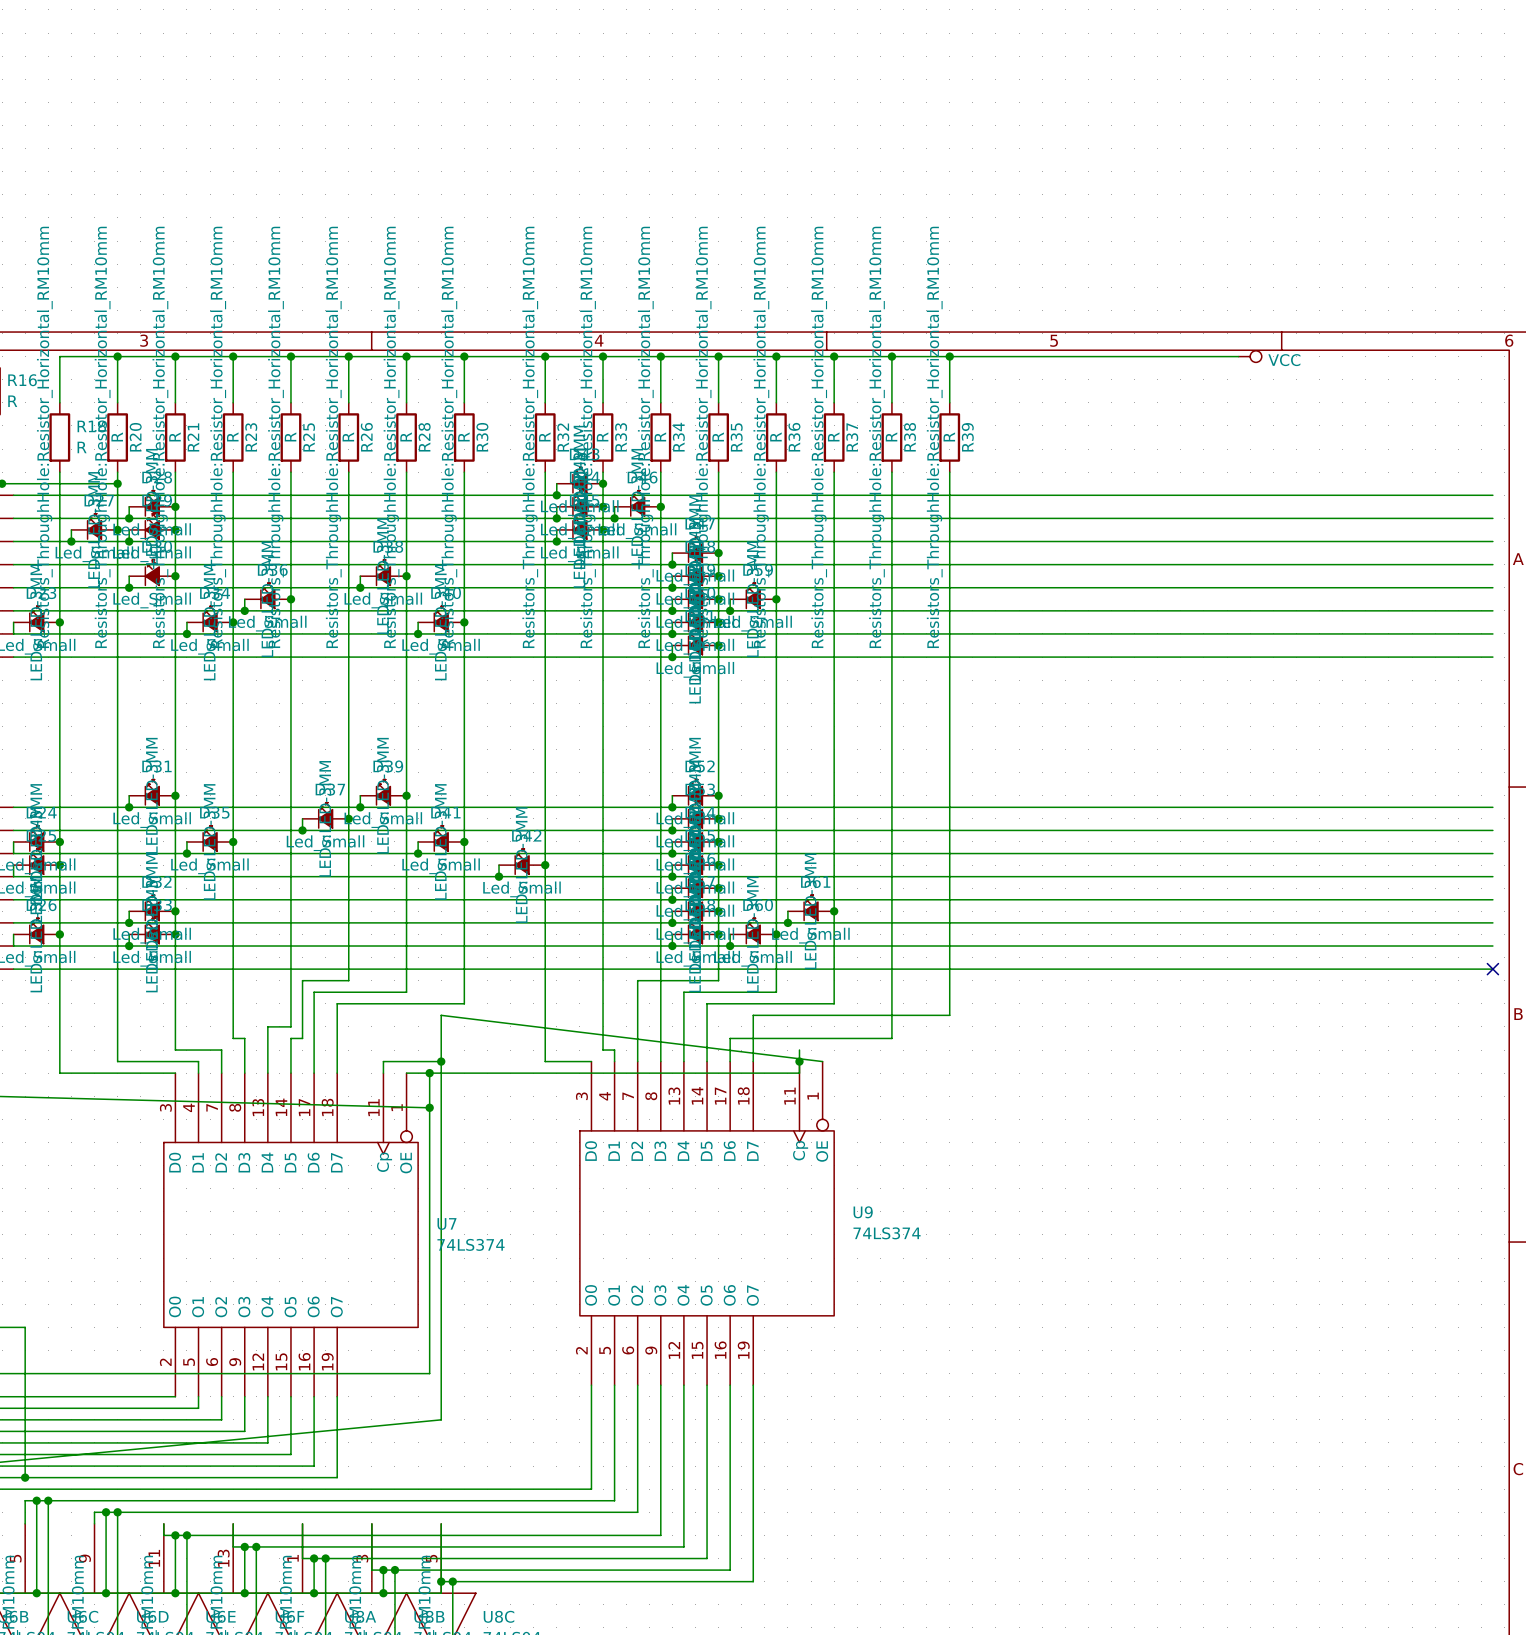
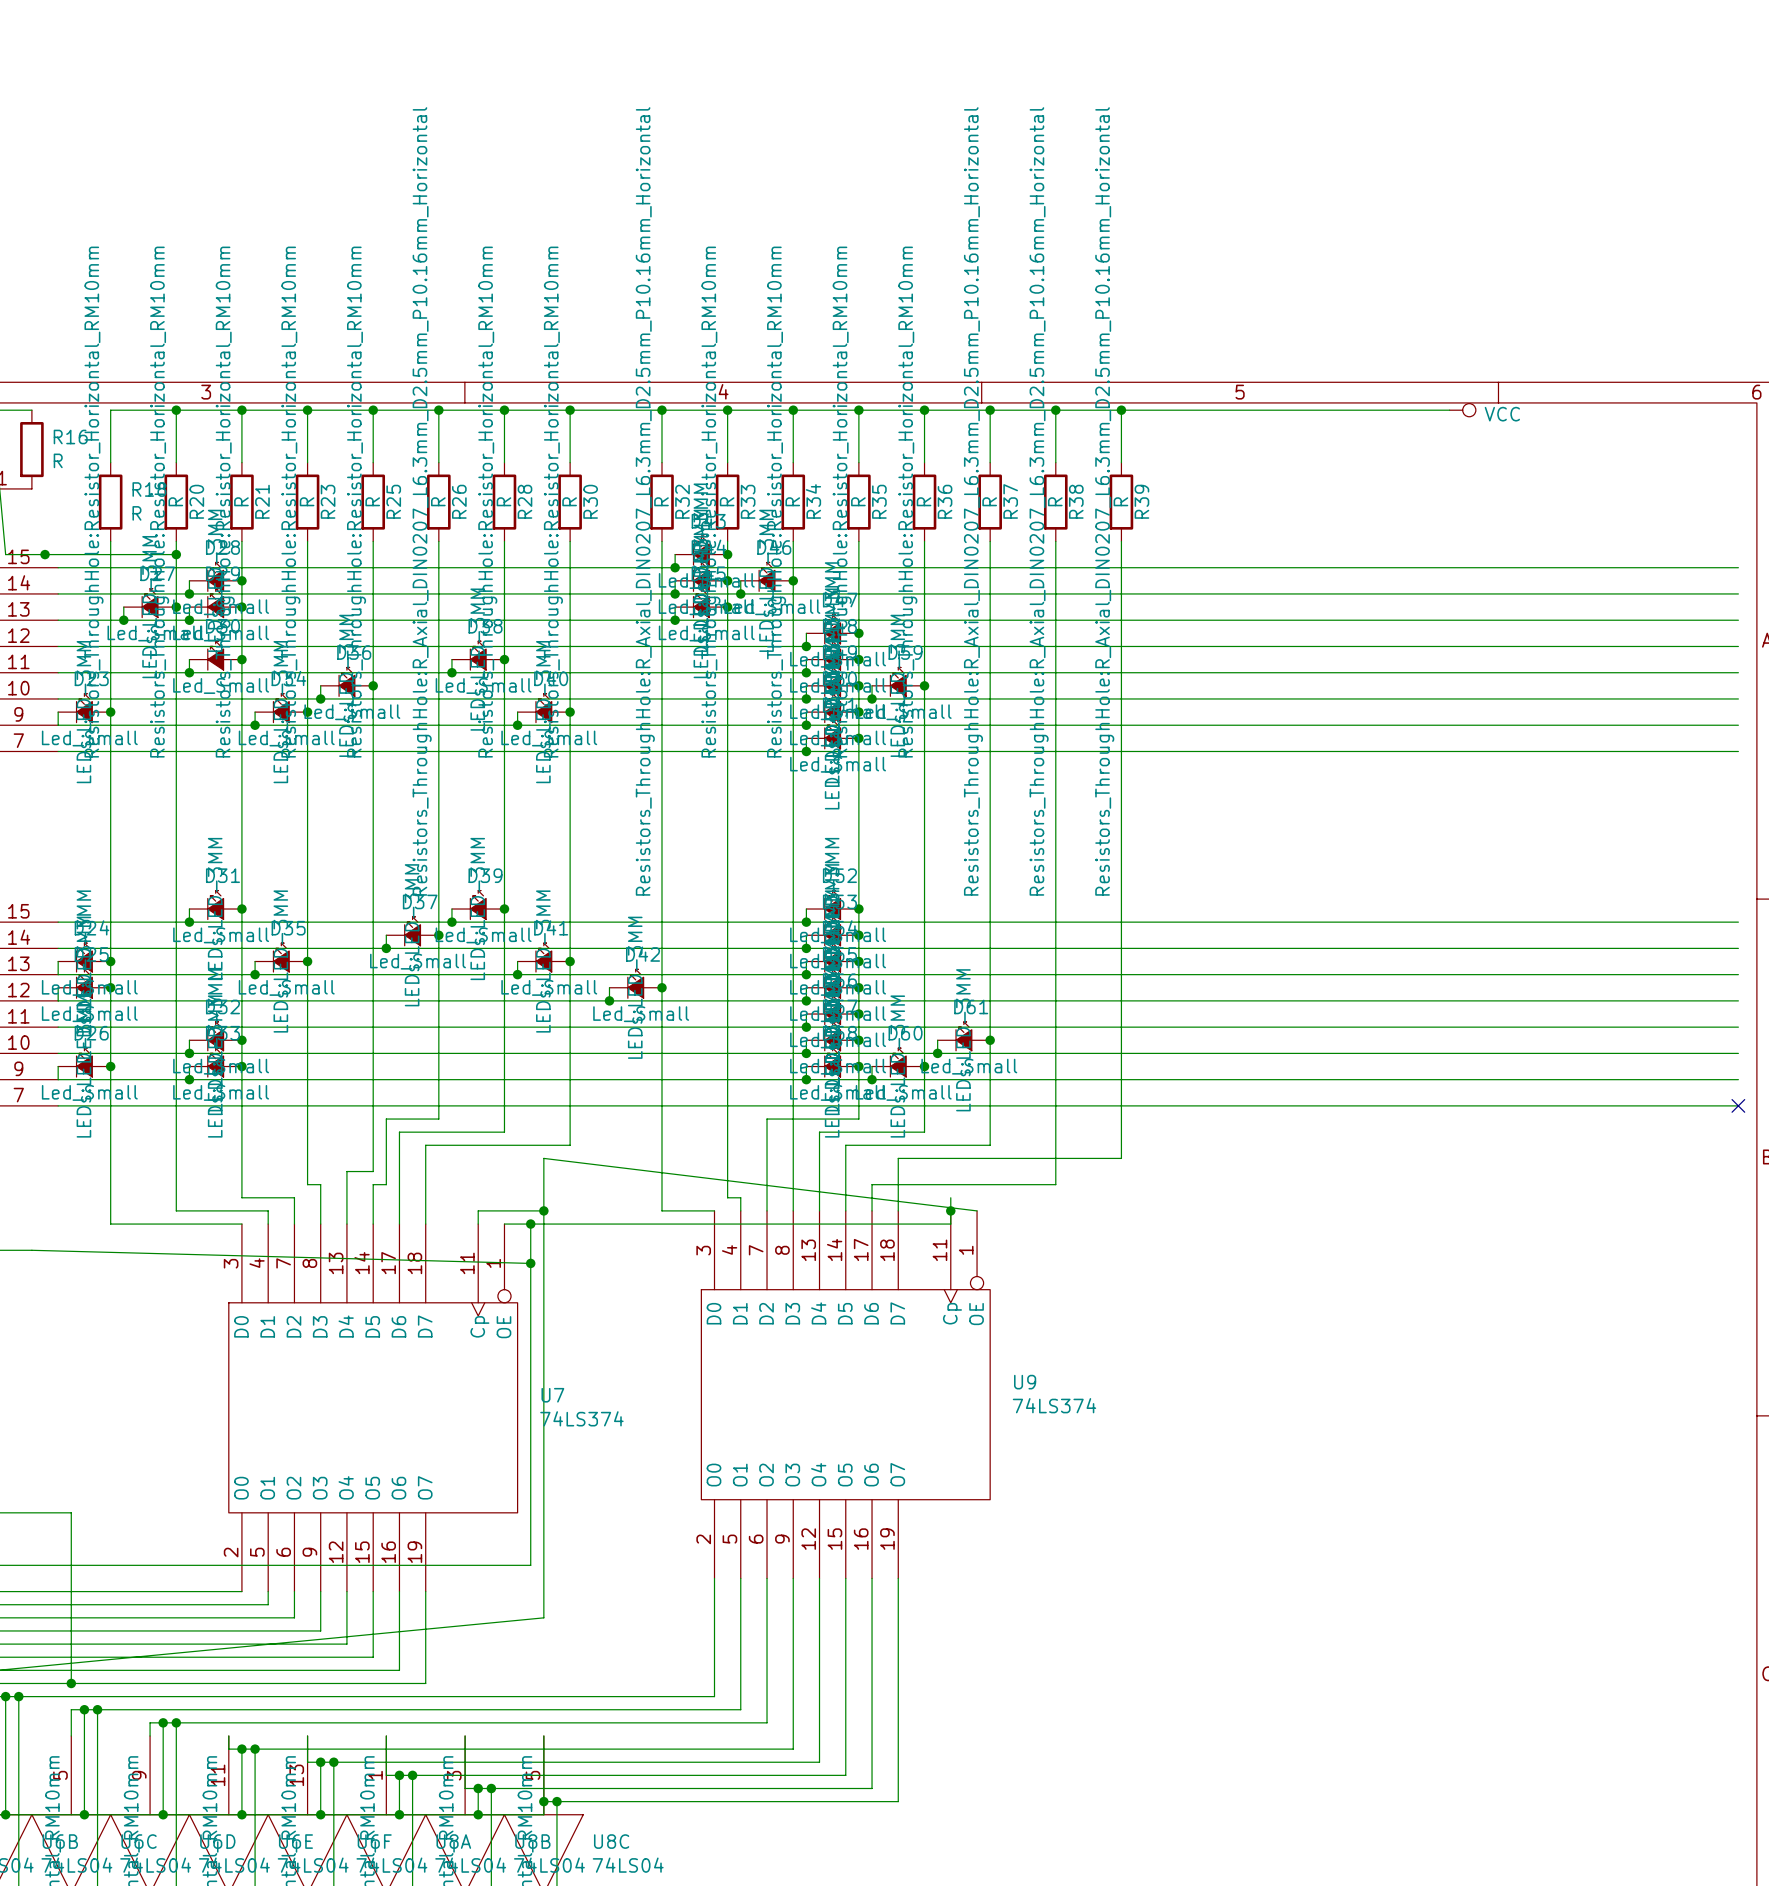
R26 text: Resistors_ThroughHole:Resistor_Horizontal_RM10mm (333, 437) -> Resistors_ThroughHole:R_Axial_DIN0207_L6.3mm_D2.5mm_P10.16mm_Horizontal (422, 501)
R32 text: Resistors_ThroughHole:Resistor_Horizontal_RM10mm (530, 437) -> Resistors_ThroughHole:R_Axial_DIN0207_L6.3mm_D2.5mm_P10.16mm_Horizontal (645, 501)
R37 text: Resistors_ThroughHole:Resistor_Horizontal_RM10mm (819, 437) -> Resistors_ThroughHole:R_Axial_DIN0207_L6.3mm_D2.5mm_P10.16mm_Horizontal (973, 501)
R38 text: Resistors_ThroughHole:Resistor_Horizontal_RM10mm (876, 437) -> Resistors_ThroughHole:R_Axial_DIN0207_L6.3mm_D2.5mm_P10.16mm_Horizontal (1039, 501)
R39 text: Resistors_ThroughHole:Resistor_Horizontal_RM10mm (934, 437) -> Resistors_ThroughHole:R_Axial_DIN0207_L6.3mm_D2.5mm_P10.16mm_Horizontal (1104, 501)

